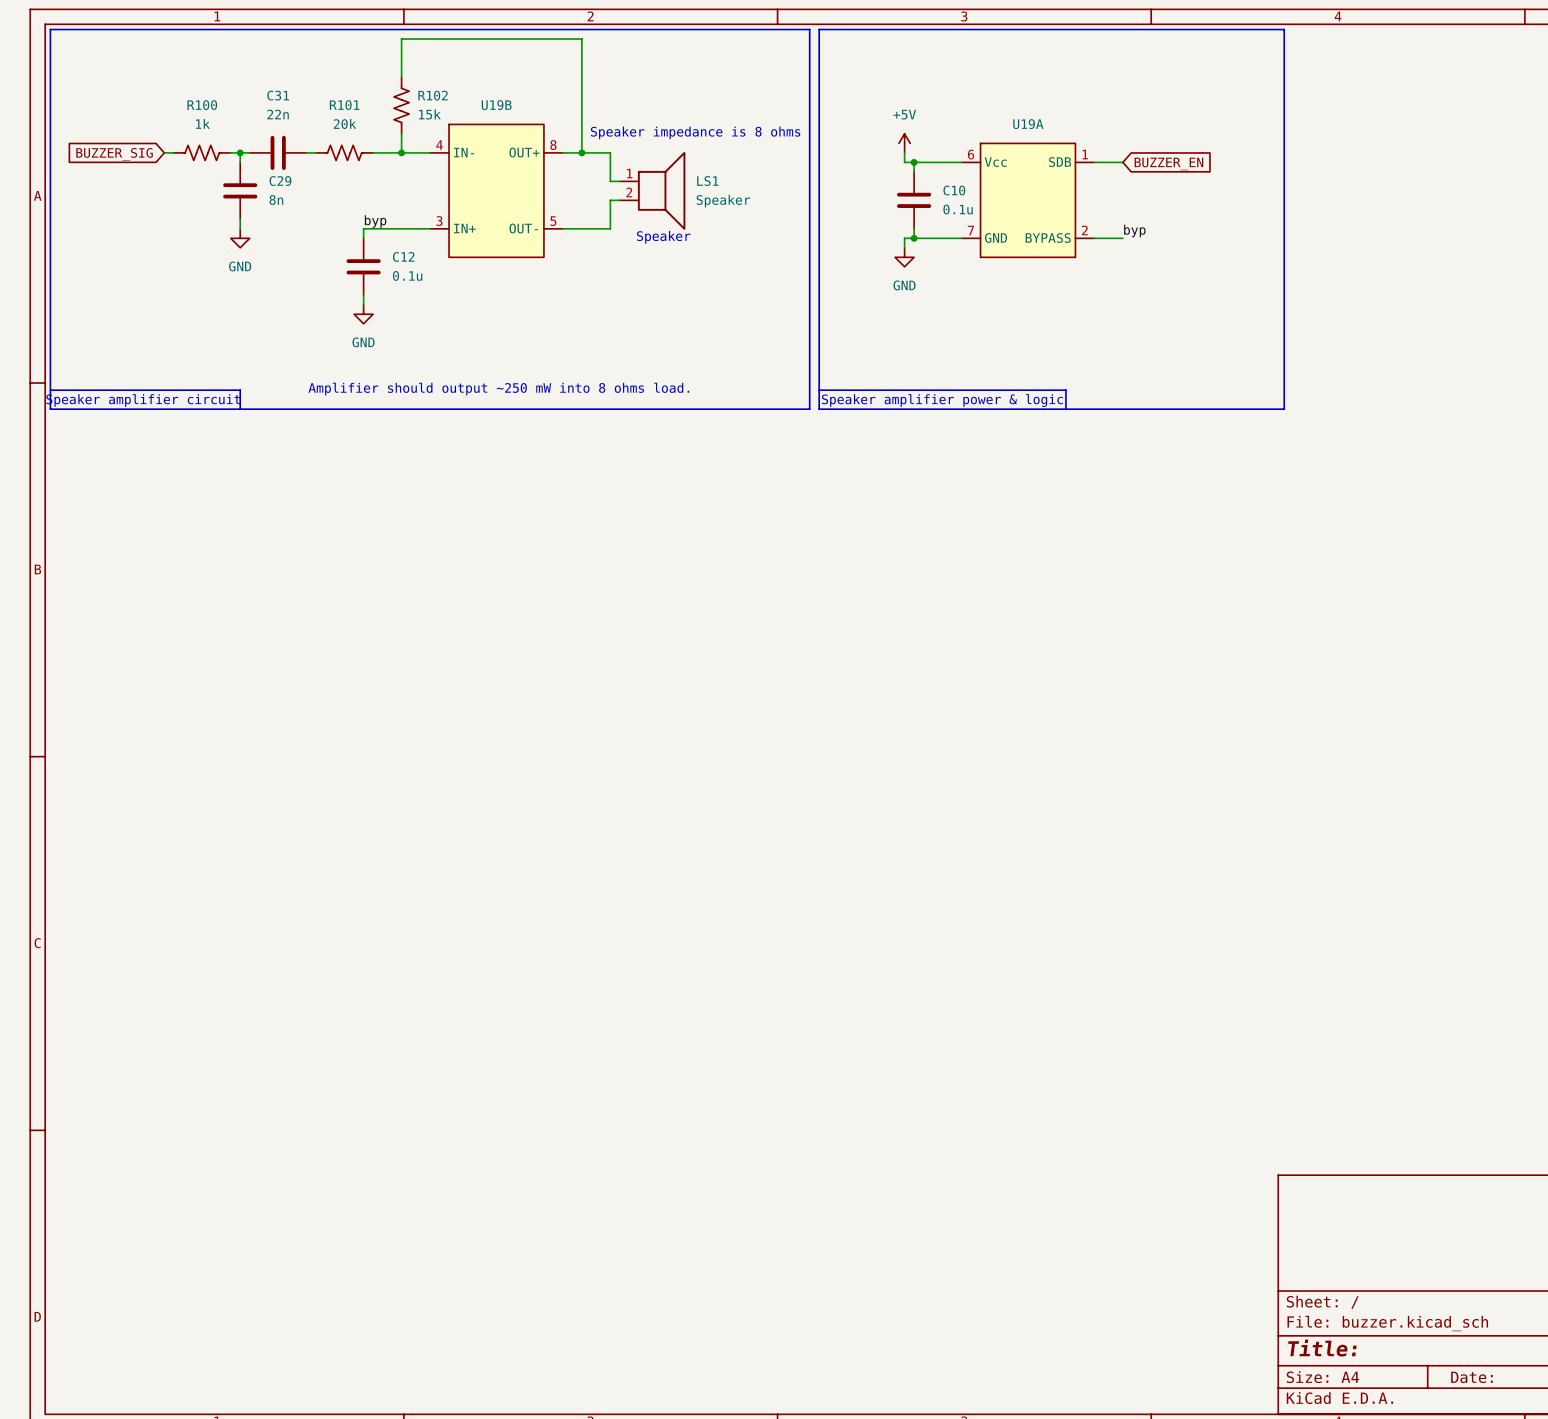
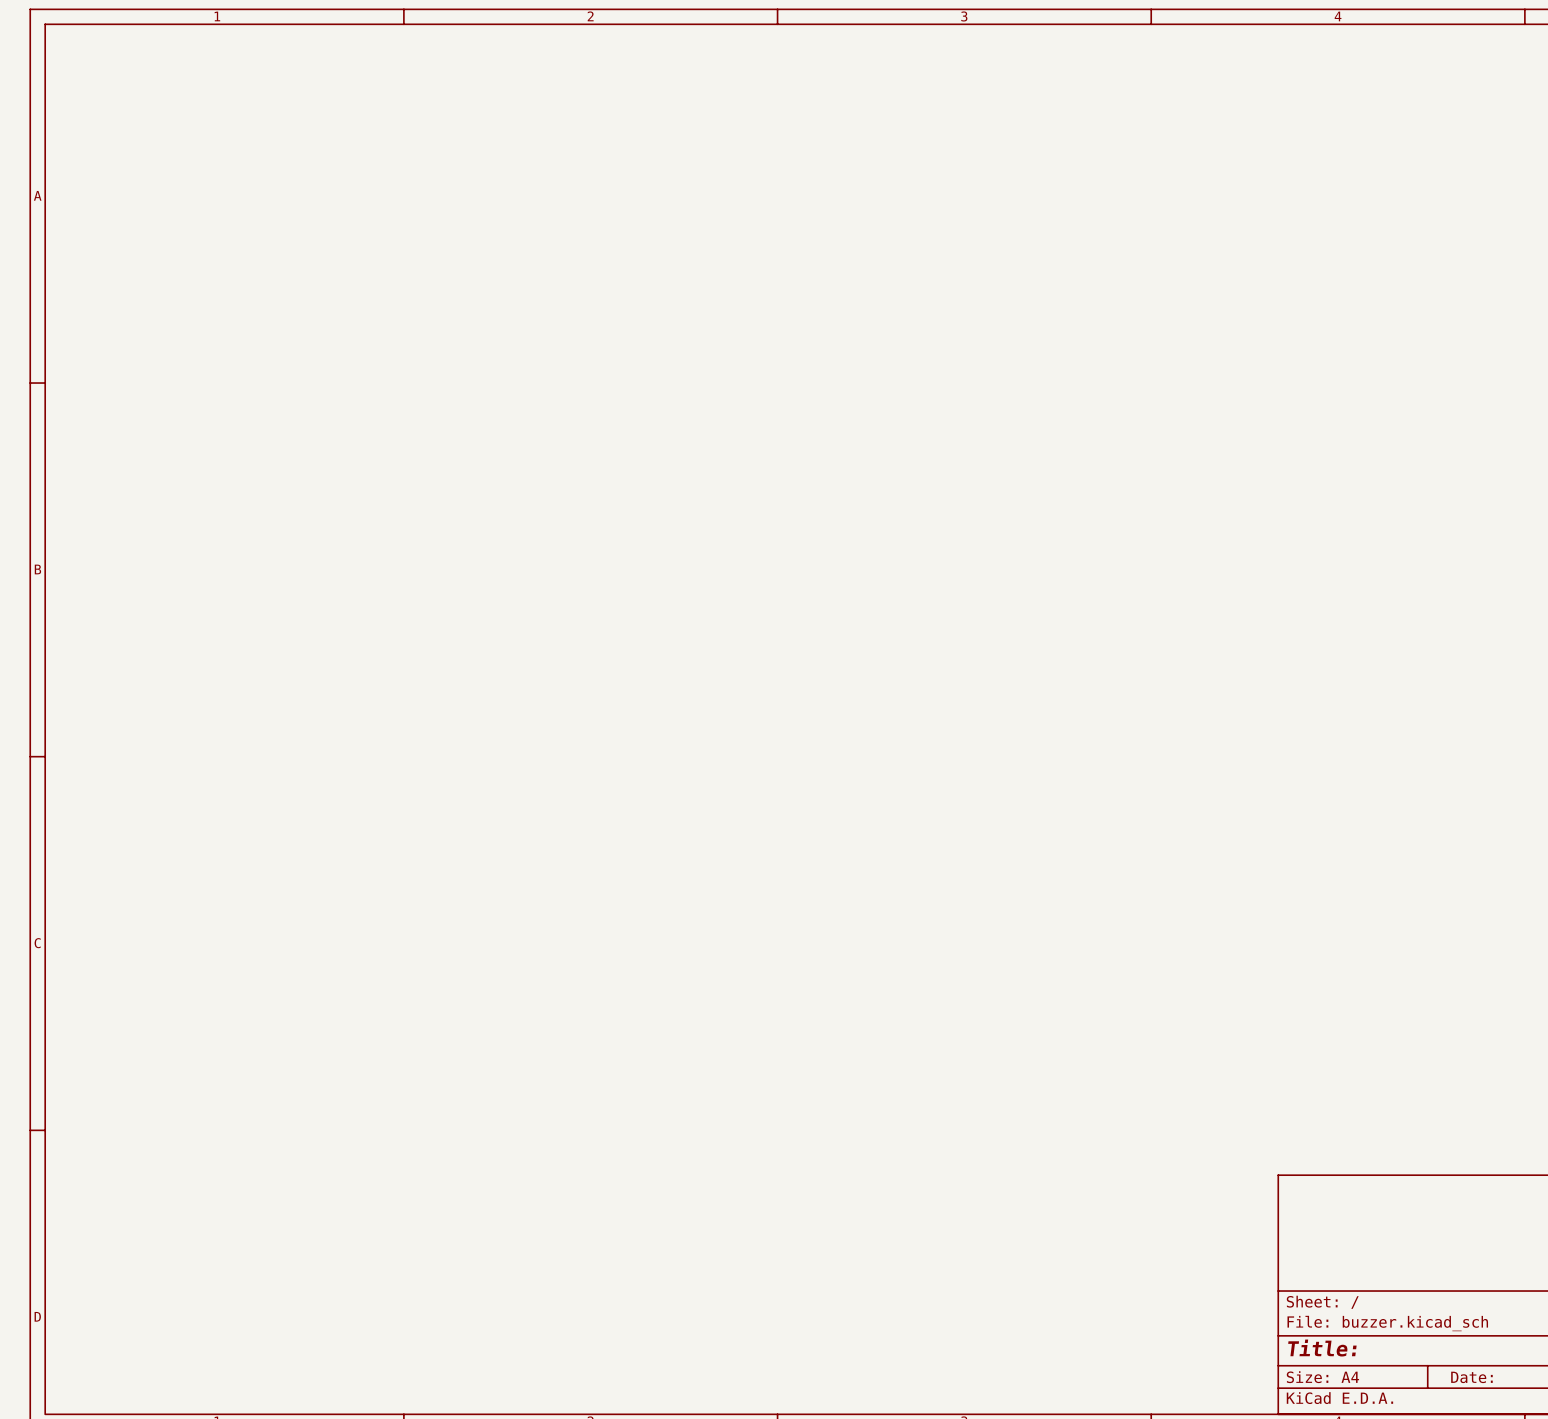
line: (50, 29) (809, 29) (809, 409) (50, 409) (50, 29) -> none
line: (819, 29) (1284, 29) (1284, 409) (819, 409) (819, 29) -> none
wire: (401, 76) (401, 39) (581, 39) (581, 152) -> none
R102: 15k (401, 105) -> none
text: Speaker impedance is 8 ohms (695, 132) -> none
wire: (401, 133) (401, 152) -> none
power symbol: +5V (904, 143) -> none
wire: (164, 152) (173, 152) -> none
R100: 1k (202, 152) -> none
wire: (230, 152) (249, 152) -> none
wire: (240, 152) (240, 162) -> none
junction: (240, 152) -> none
C31: 22n (278, 152) -> none
wire: (306, 152) (316, 152) -> none
R101: 20k (344, 152) -> none
wire: (373, 152) (430, 152) -> none
junction: (401, 152) -> none
wire: (562, 152) (610, 152) (610, 181) (619, 181) -> none
junction: (581, 152) -> none
wire: (904, 152) (904, 162) (961, 162) -> none
global label: BUZZER_SIG (114, 154) -> none
wire: (914, 162) (914, 171) -> none
junction: (914, 162) -> none
wire: (1094, 162) (1122, 162) -> none
global label: BUZZER_EN (1168, 163) -> none
C29: 8n (240, 190) -> none
U19B: (496, 190) -> none
LS1: Speaker (652, 190) -> none
wire: (619, 200) (610, 200) (610, 228) (562, 228) -> none
C10: 0.1u (914, 200) -> none
U19A: (1027, 200) -> none
wire: (240, 219) (240, 228) -> none
label: byp (375, 221) -> none
wire: (430, 228) (363, 228) (363, 238) -> none
wire: (914, 228) (914, 238) -> none
label: byp (1134, 231) -> none
text: Speaker (663, 237) -> none
power symbol: GND (240, 238) -> none
junction: (914, 238) -> none
wire: (961, 238) (904, 238) (904, 247) -> none
wire: (1094, 238) (1122, 238) -> none
power symbol: GND (904, 257) -> none
C12: 0.1u (363, 266) -> none
wire: (363, 295) (363, 304) -> none
power symbol: GND (363, 314) -> none
text: Amplifier should output ~250 mW into 8 ohms load. (498, 389) -> none
line: (50, 390) (240, 390) (240, 409) -> none
line: (819, 390) (1065, 390) (1065, 409) -> none
text: Speaker amplifier circuit (143, 400) -> none
text: Speaker amplifier power & logic (942, 400) -> none

